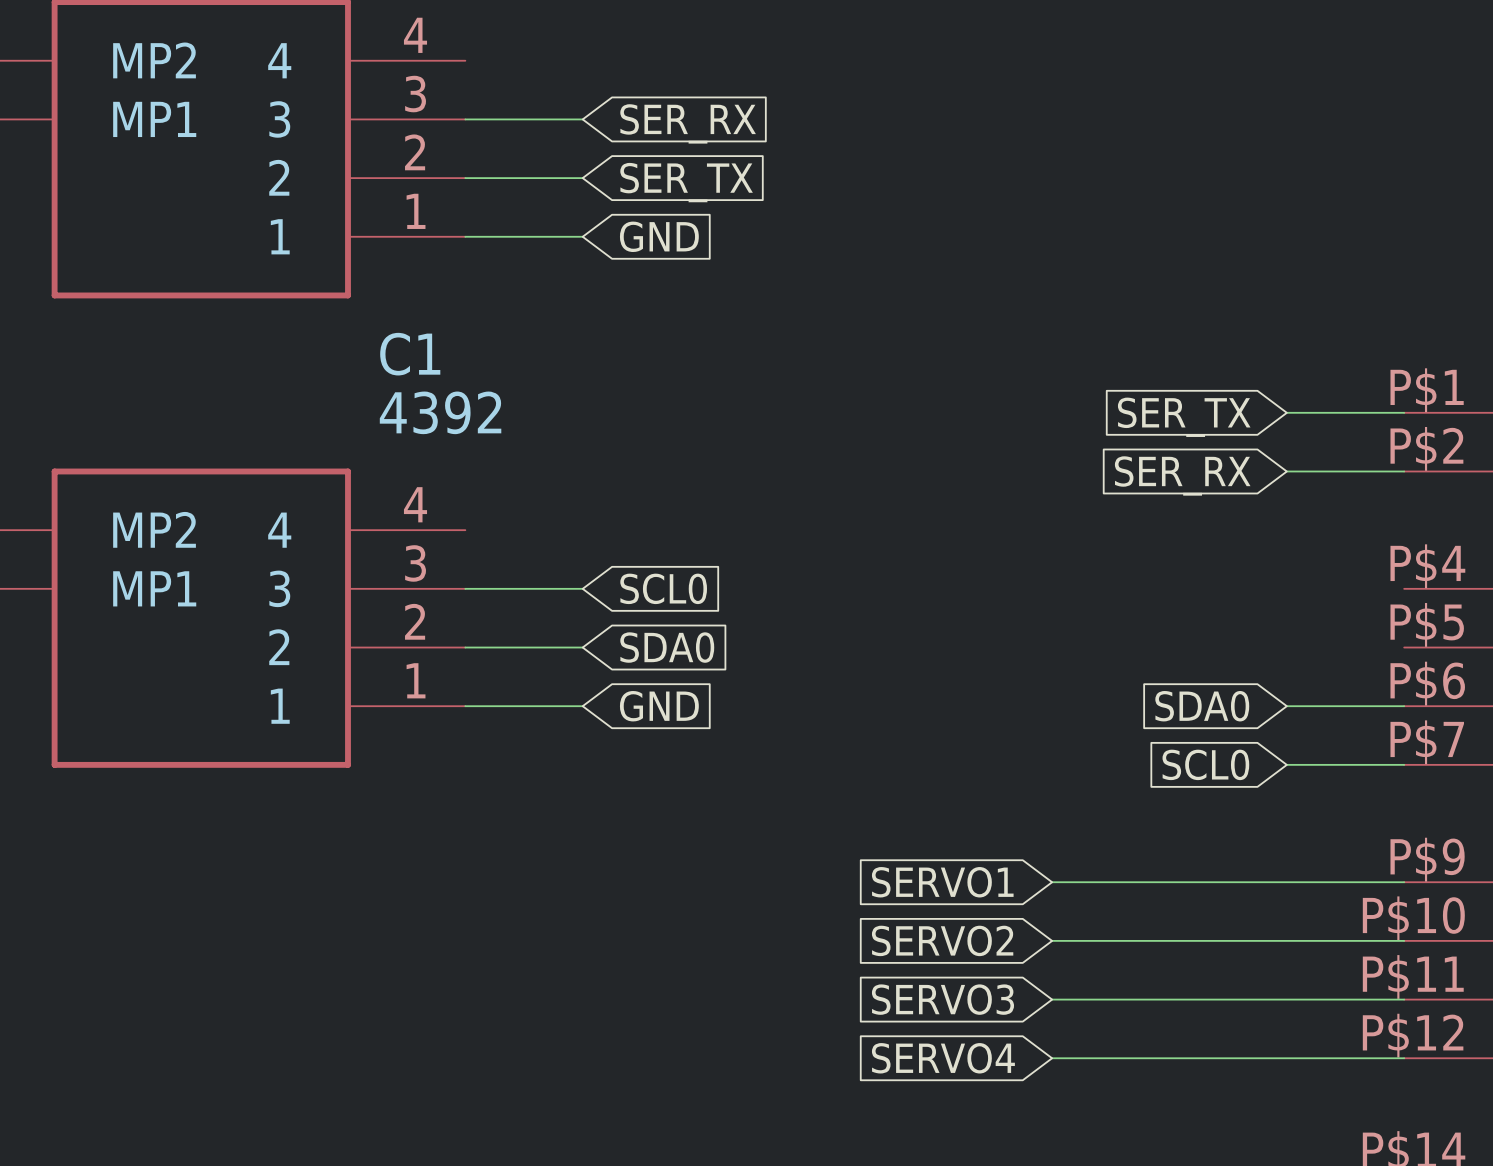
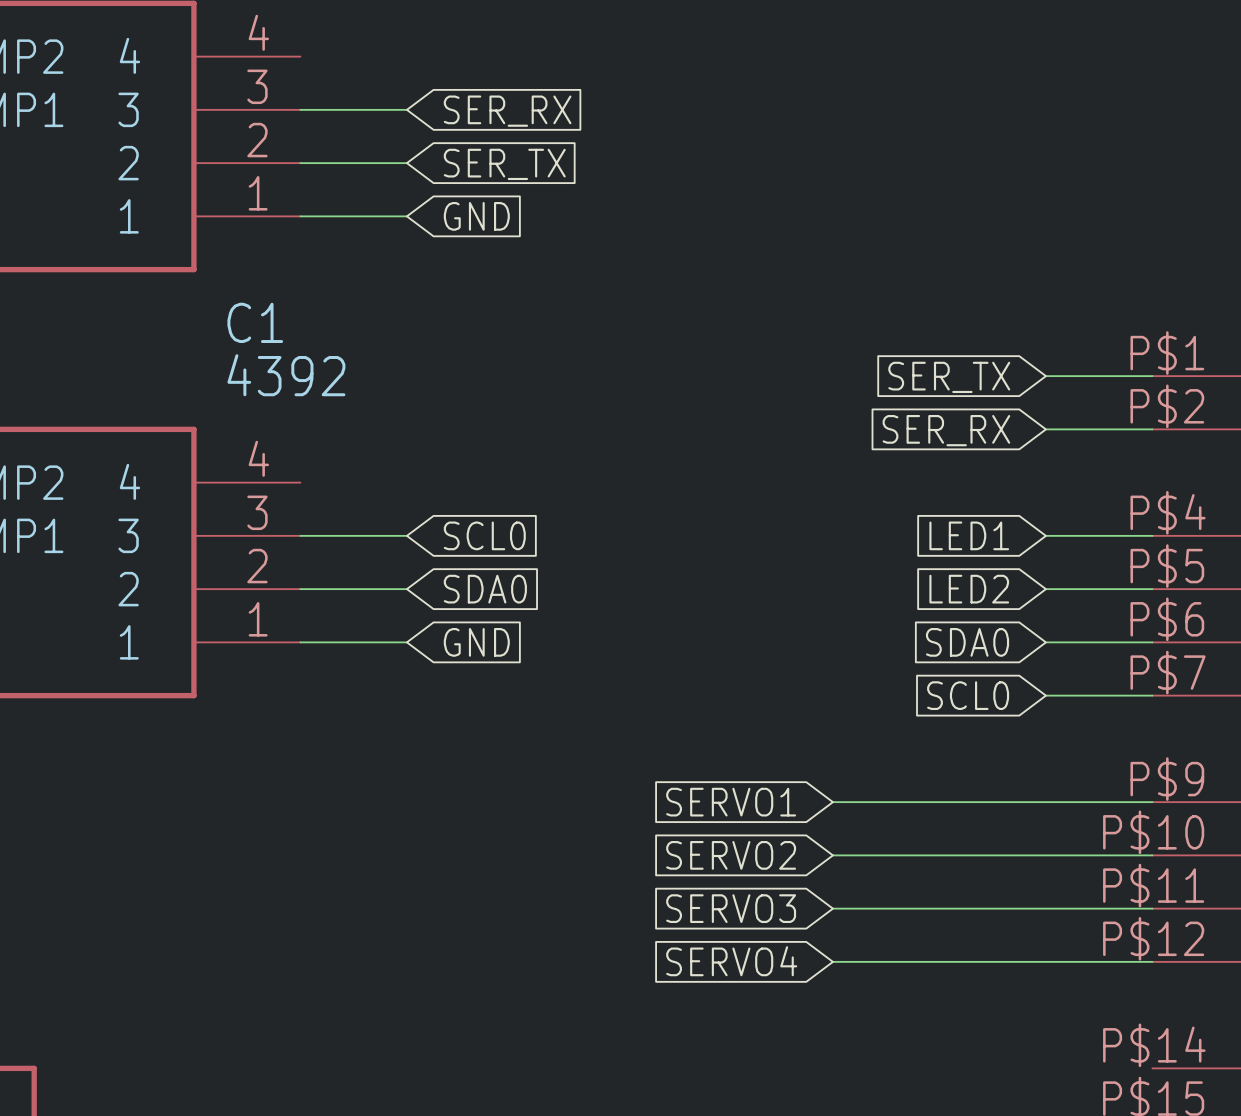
global label: none -> LED1 (969, 535)
wire: none -> (1045, 535) (1152, 535)
global label: none -> LED2 (969, 589)
wire: none -> (1045, 589) (1152, 589)

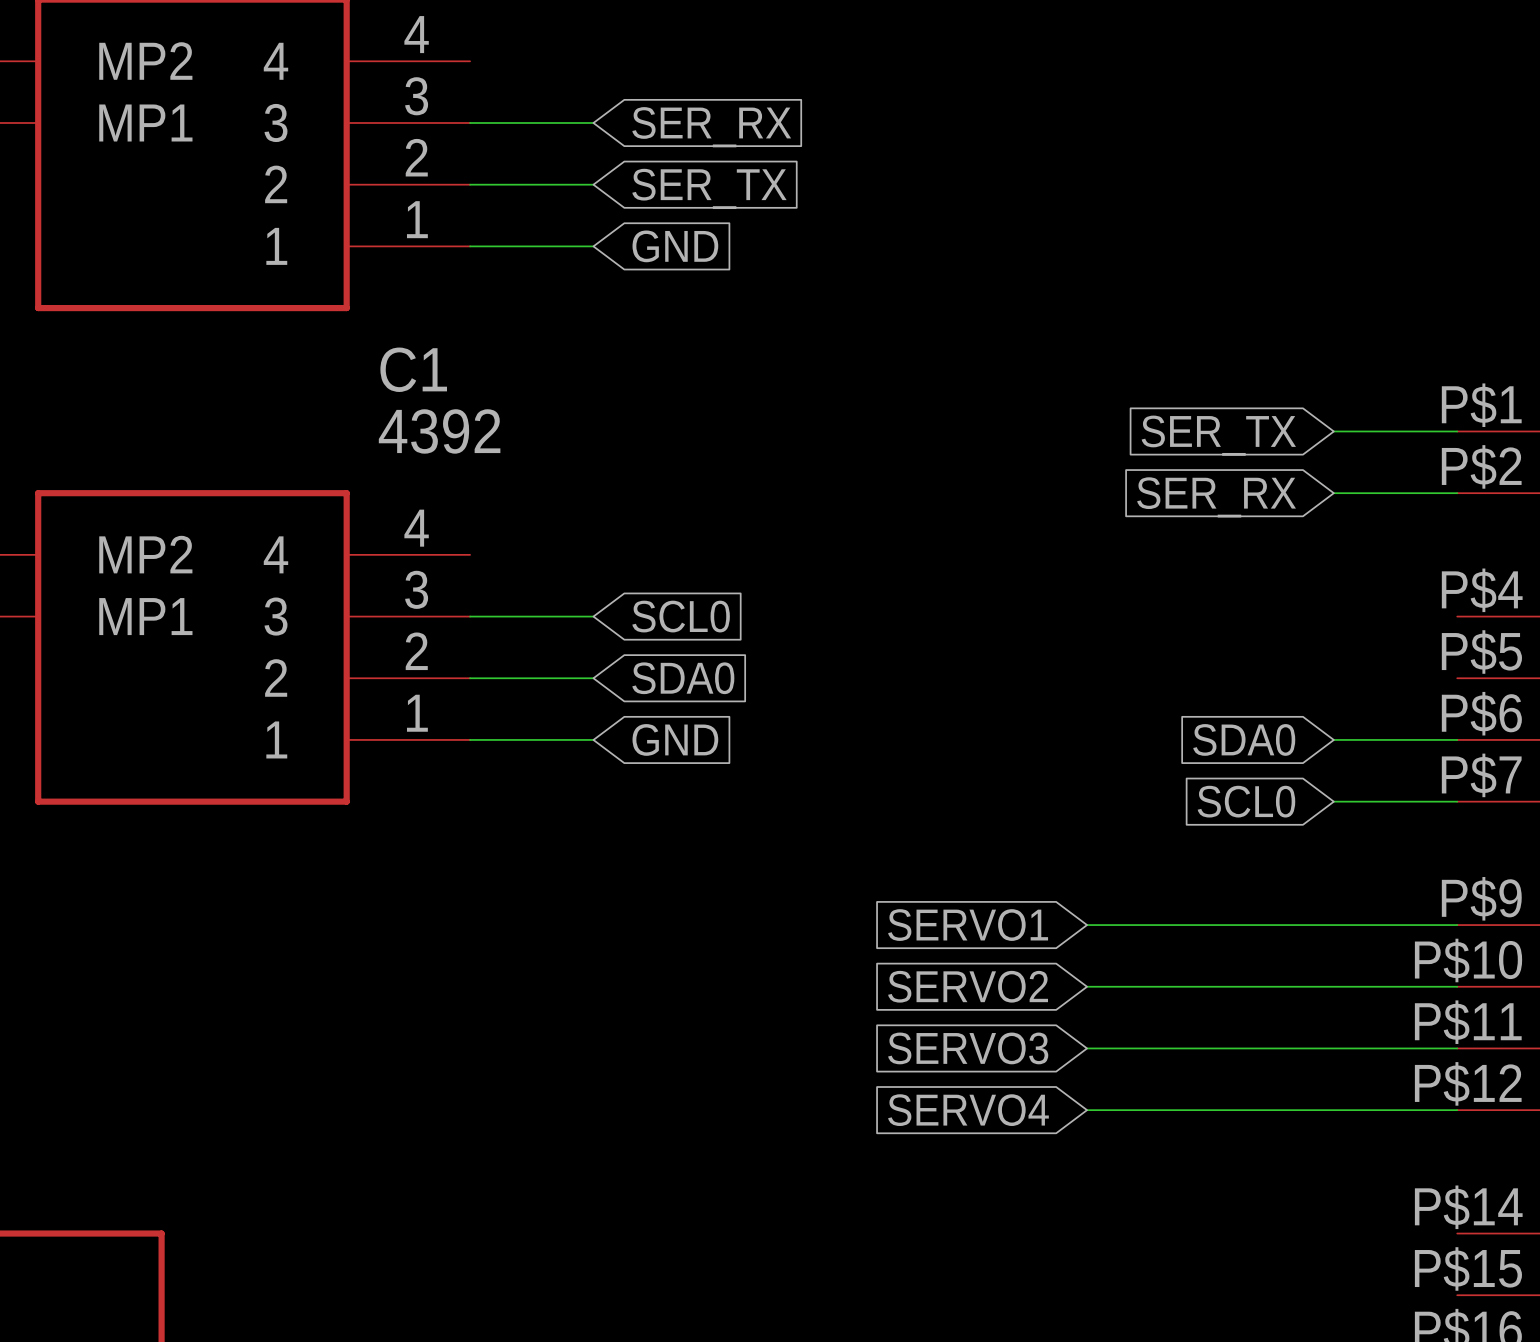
global label: LED1 (969, 535) -> none
wire: (1045, 535) (1152, 535) -> none
global label: LED2 (969, 589) -> none
wire: (1045, 589) (1152, 589) -> none

